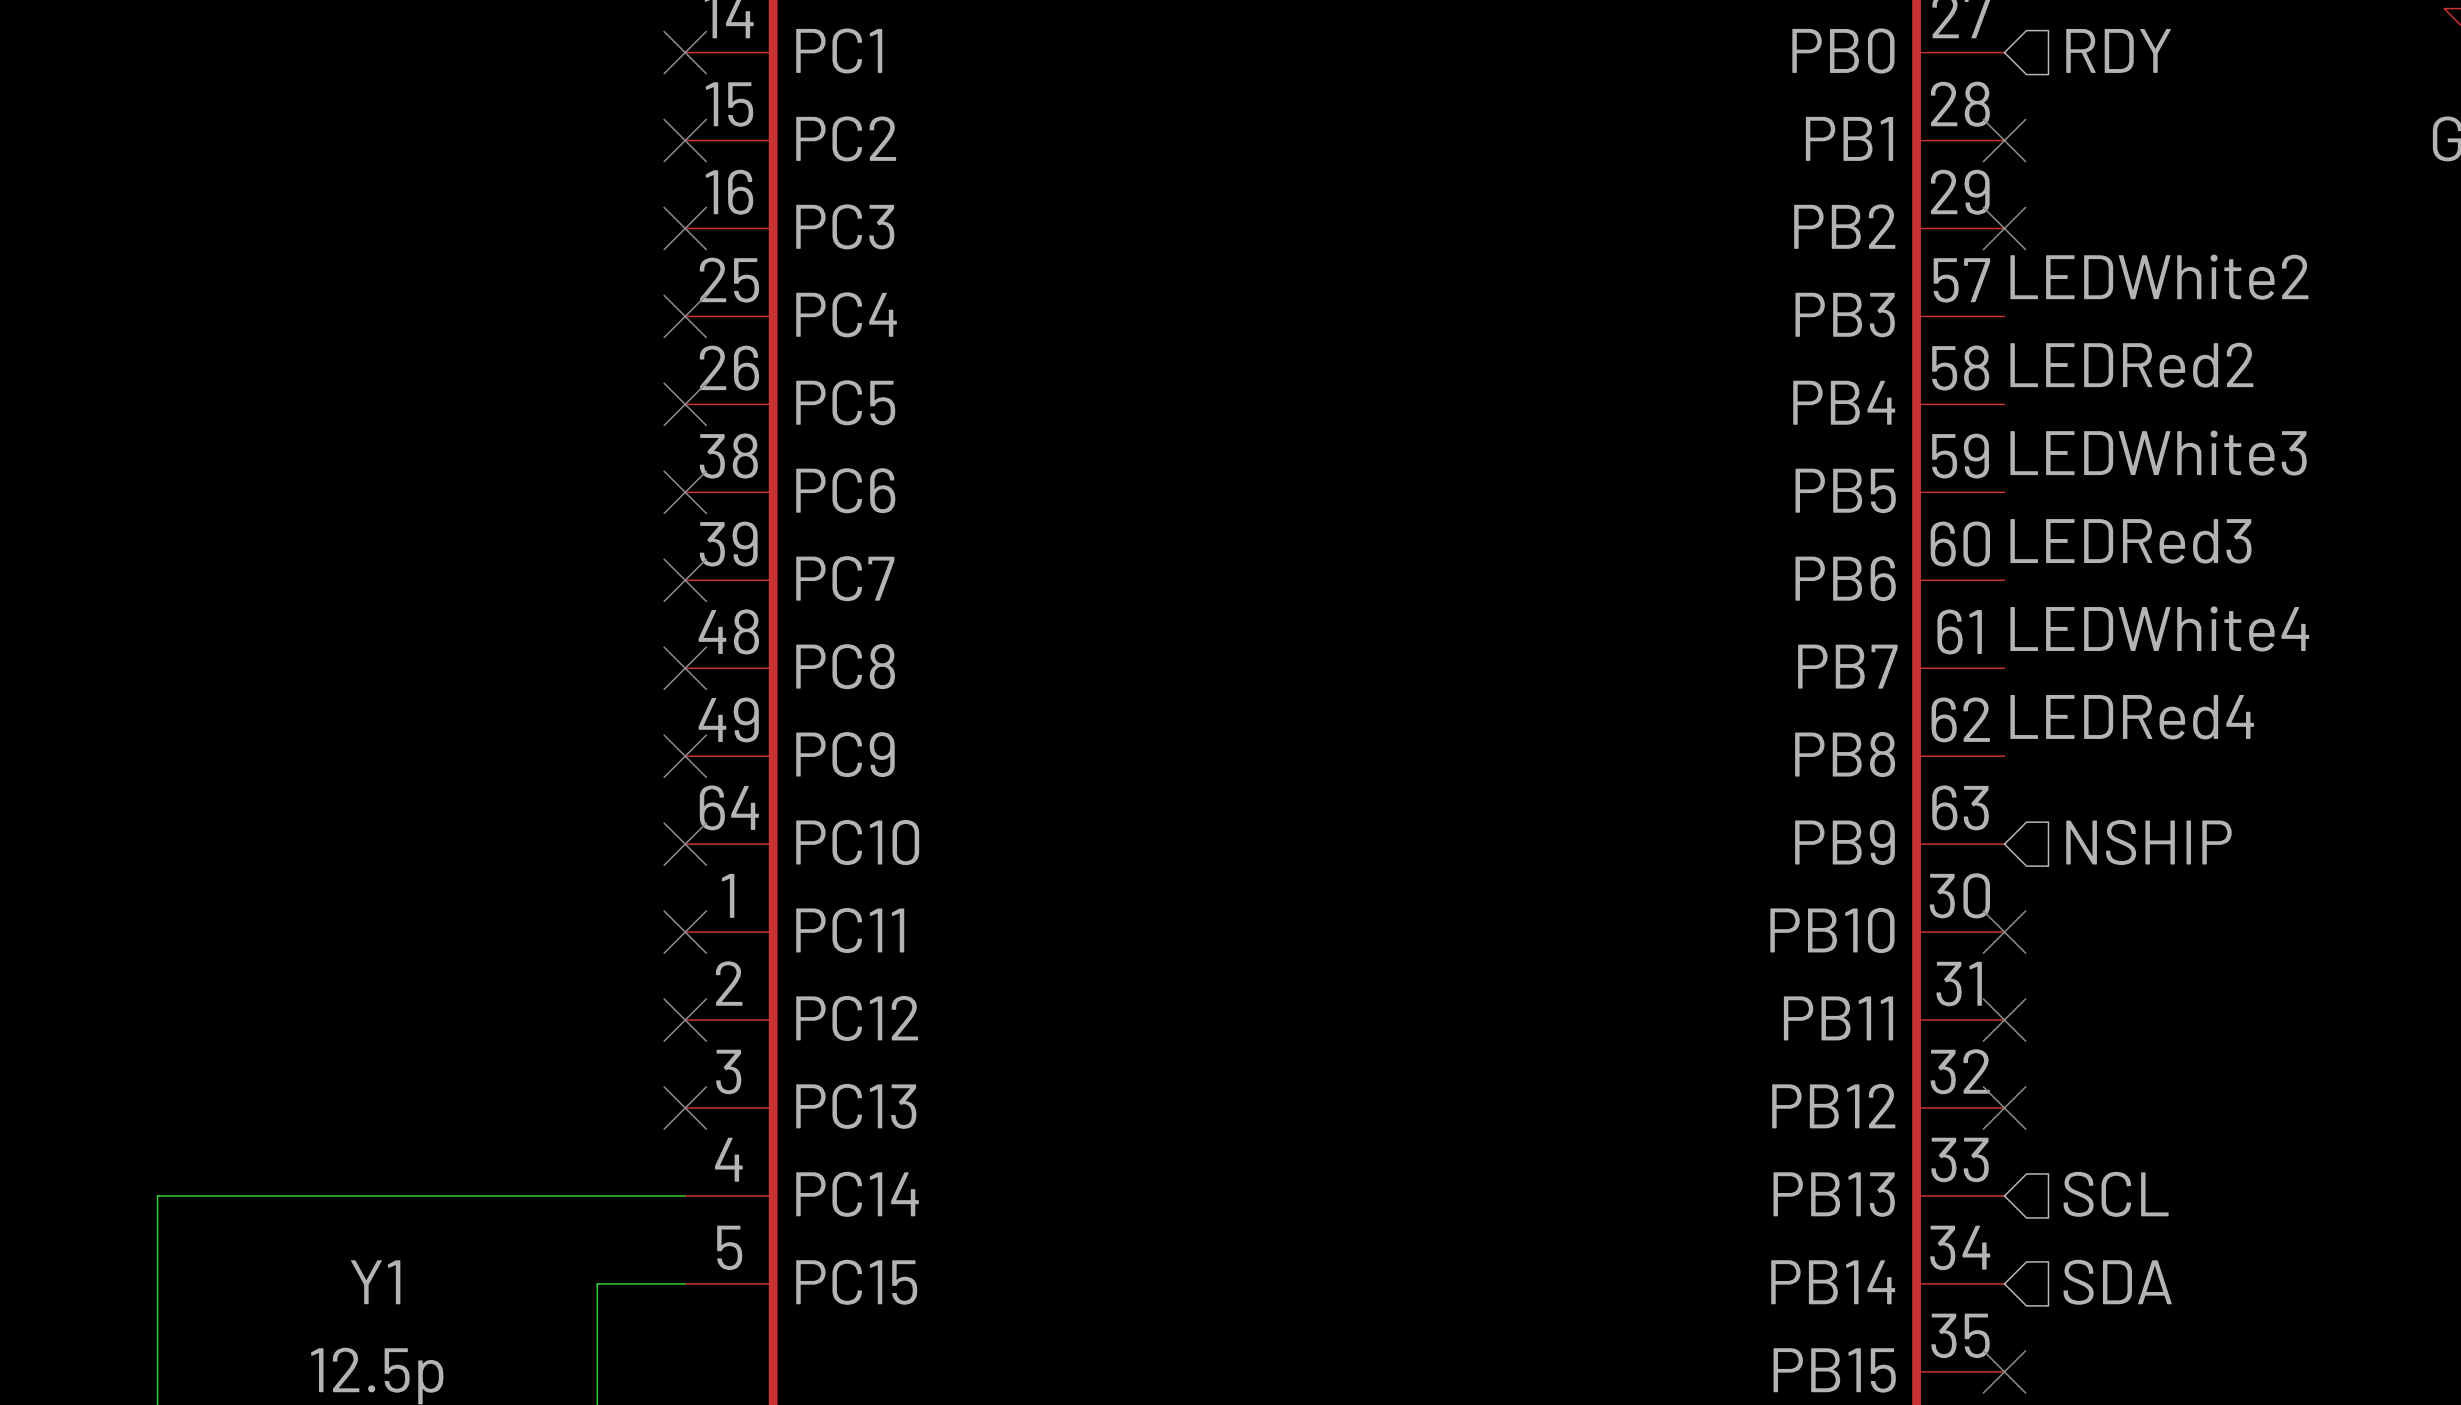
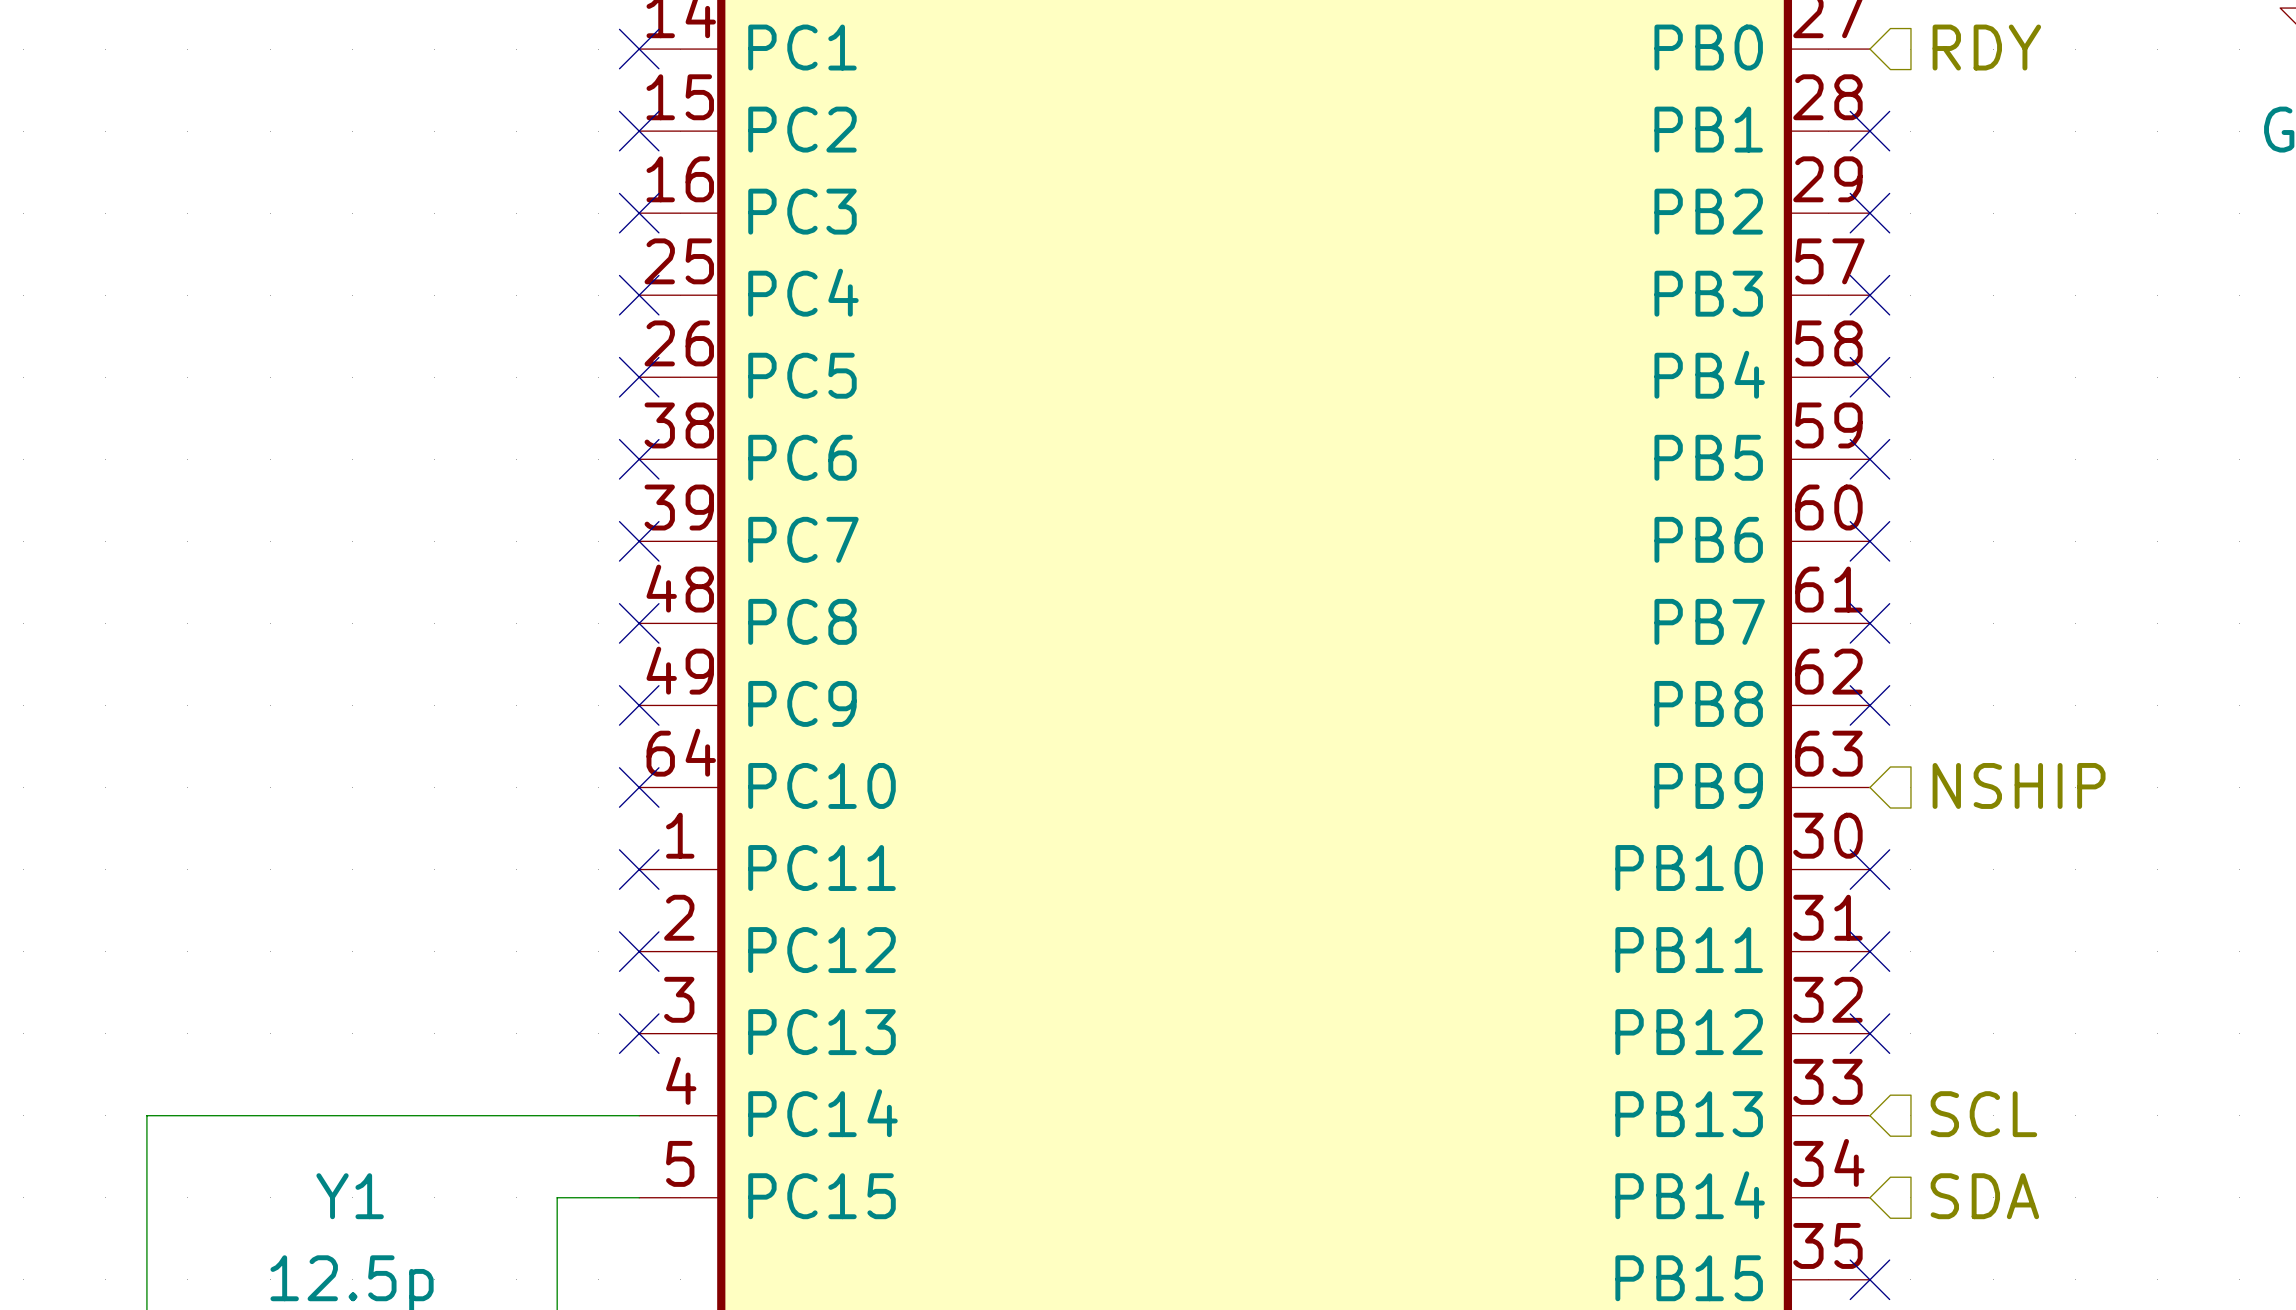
label: LEDWhite2 (2159, 277) -> none
no-connect mark: none -> (1869, 295)
label: LEDRed2 (2131, 365) -> none
no-connect mark: none -> (1869, 377)
label: LEDWhite3 (2158, 453) -> none
no-connect mark: none -> (1869, 459)
label: LEDRed3 (2130, 541) -> none
no-connect mark: none -> (1869, 541)
label: LEDWhite4 (2159, 628) -> none
no-connect mark: none -> (1869, 623)
label: LEDRed4 (2132, 717) -> none
no-connect mark: none -> (1869, 705)

